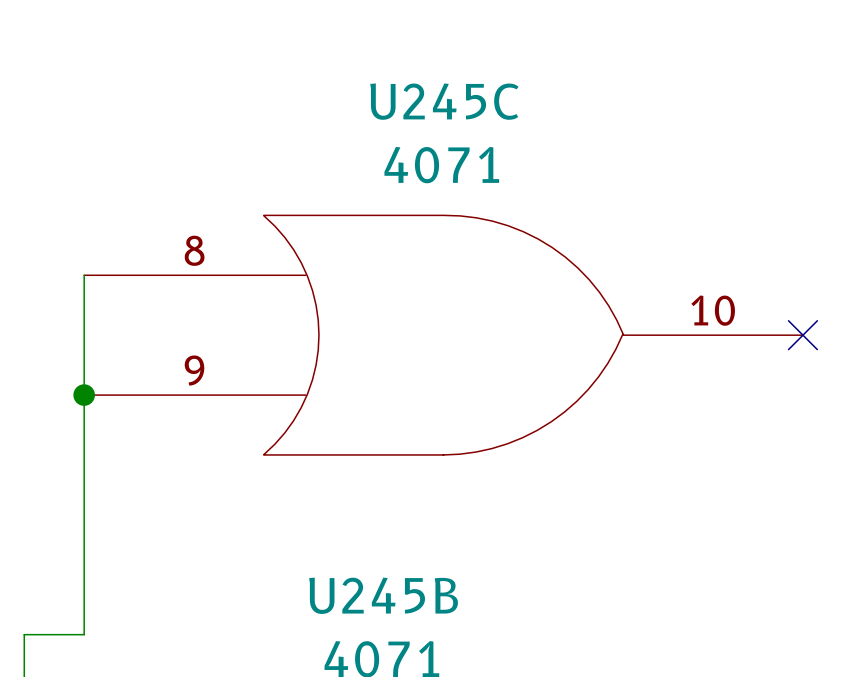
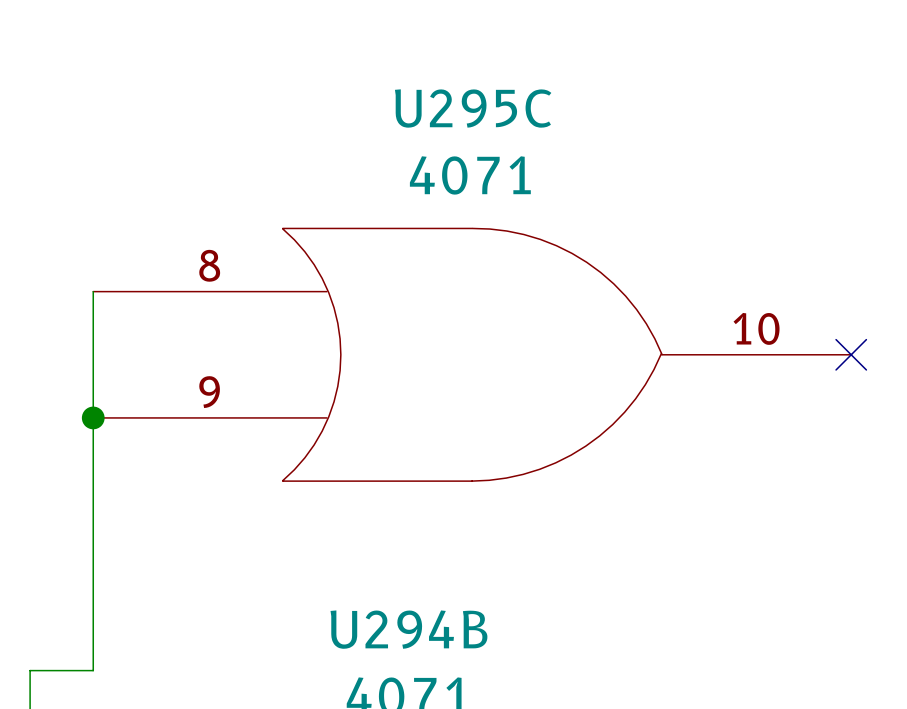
U245C name: U245C (444, 101) -> U295C (473, 108)
U245B name: U245B (383, 595) -> U294B (408, 629)

